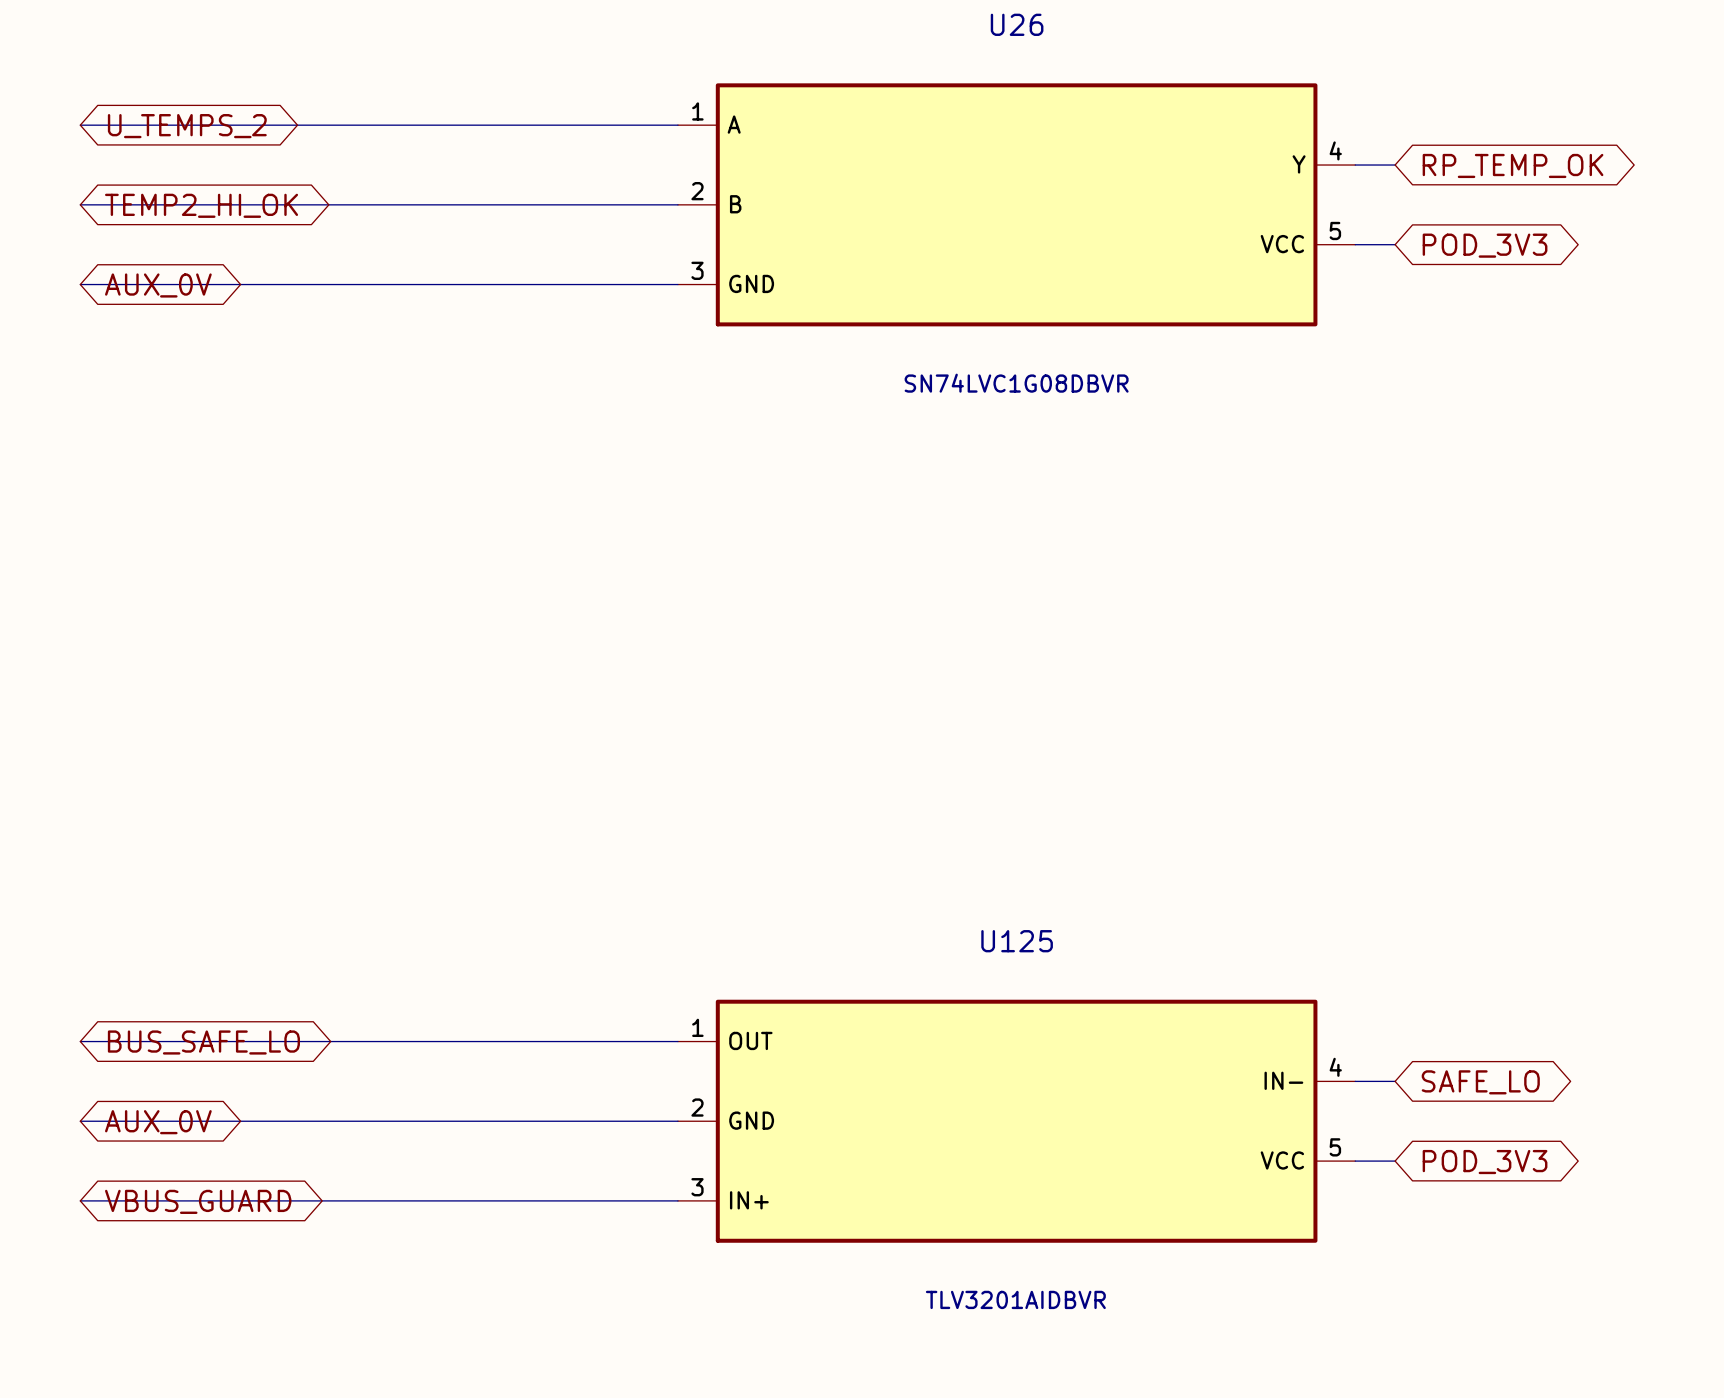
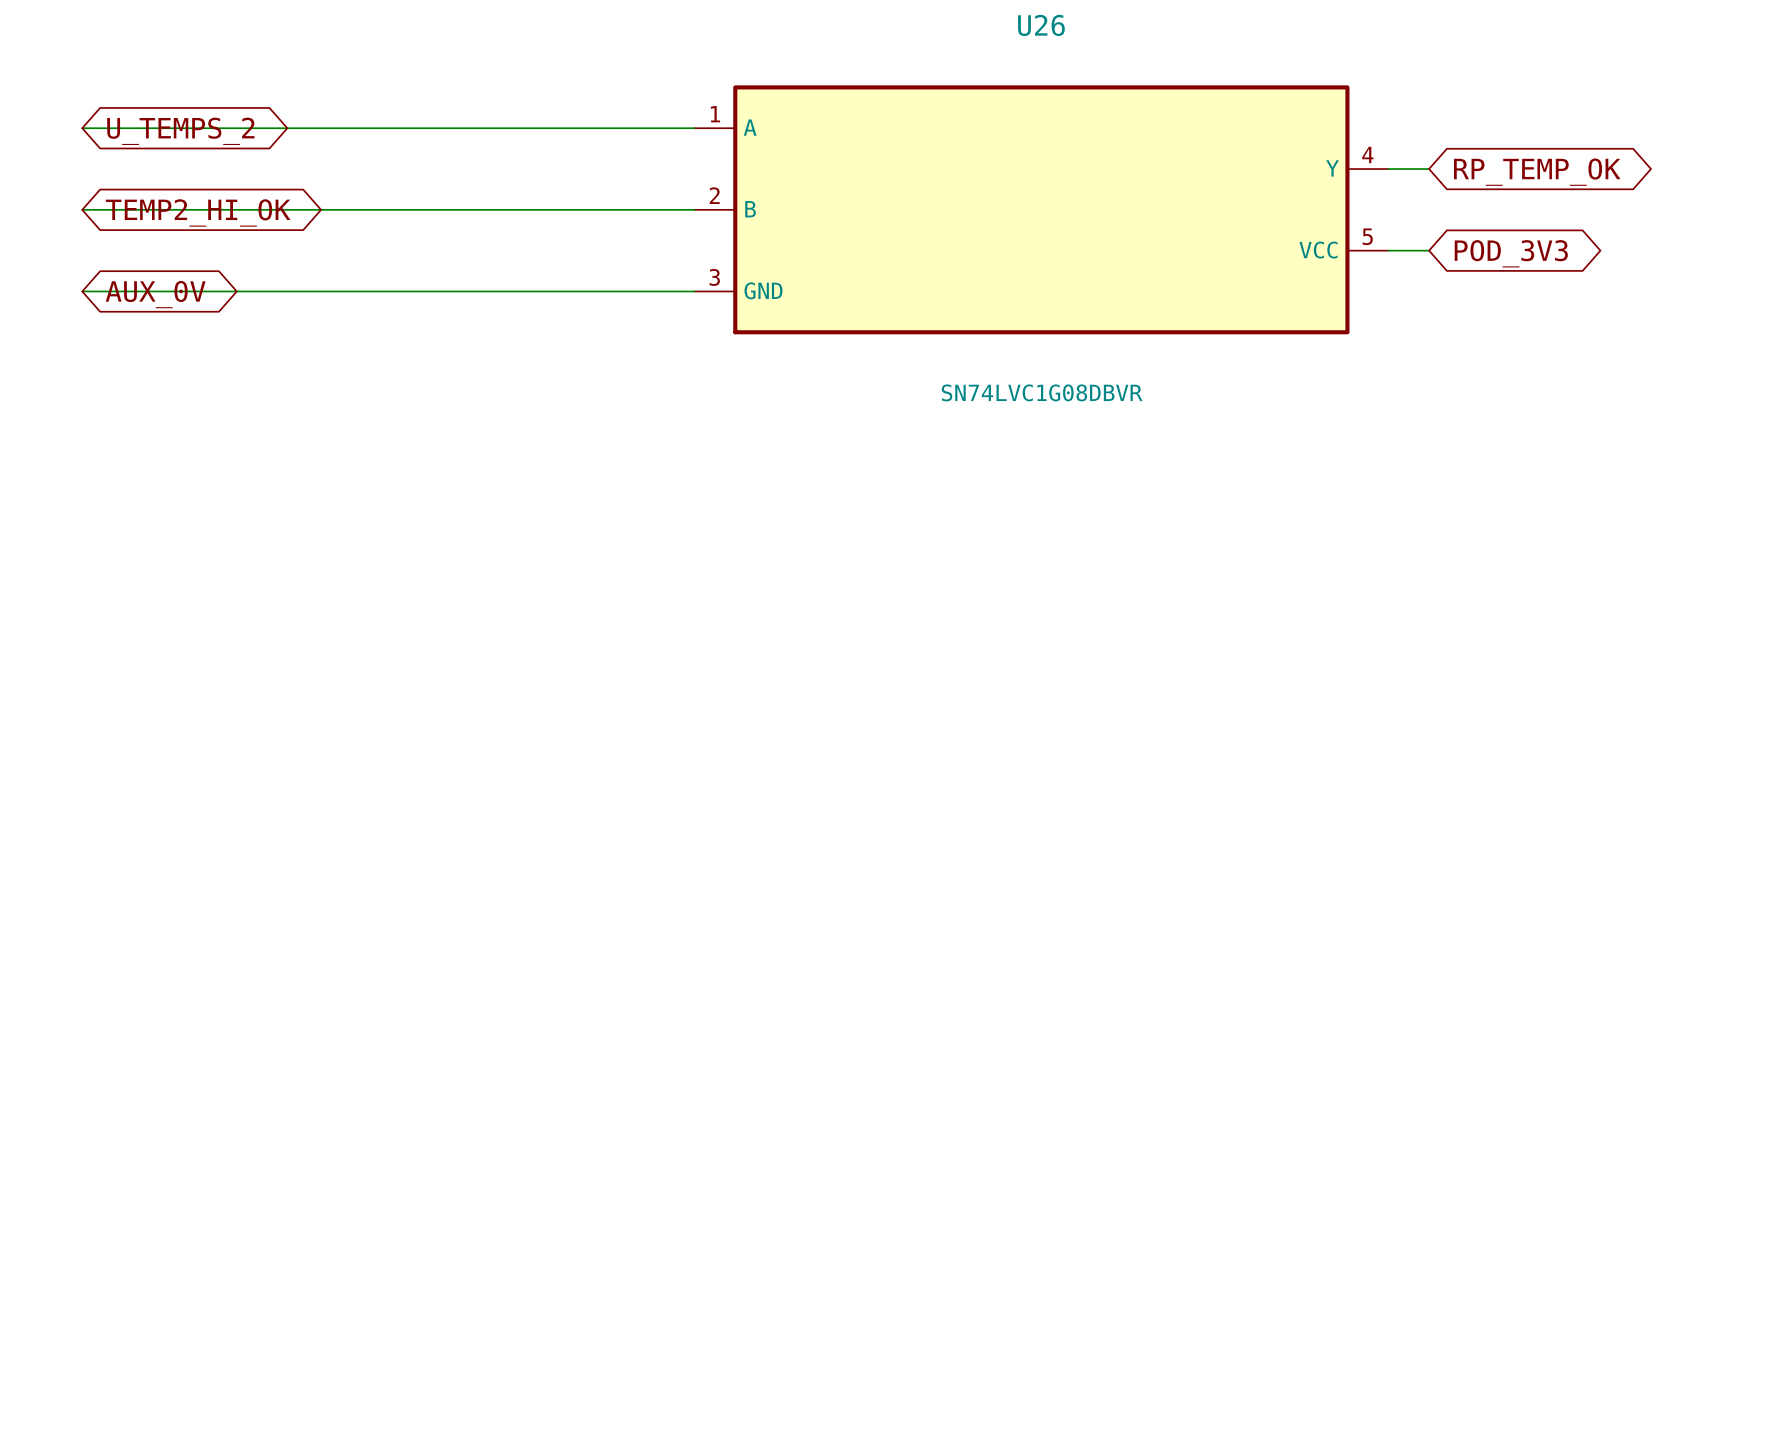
wire: (80, 1041) (677, 1041) -> none
global label: BUS_SAFE_LO (203, 1042) -> none
wire: (1355, 1081) (1395, 1081) -> none
global label: SAFE_LO (1480, 1082) -> none
wire: (80, 1121) (677, 1121) -> none
U125: TLV3201AIDBVR (1016, 1121) -> none
global label: AUX_0V (158, 1122) -> none
wire: (1355, 1161) (1395, 1161) -> none
global label: POD_3V3 (1485, 1162) -> none
wire: (80, 1200) (677, 1200) -> none
global label: VBUS_GUARD (198, 1201) -> none

